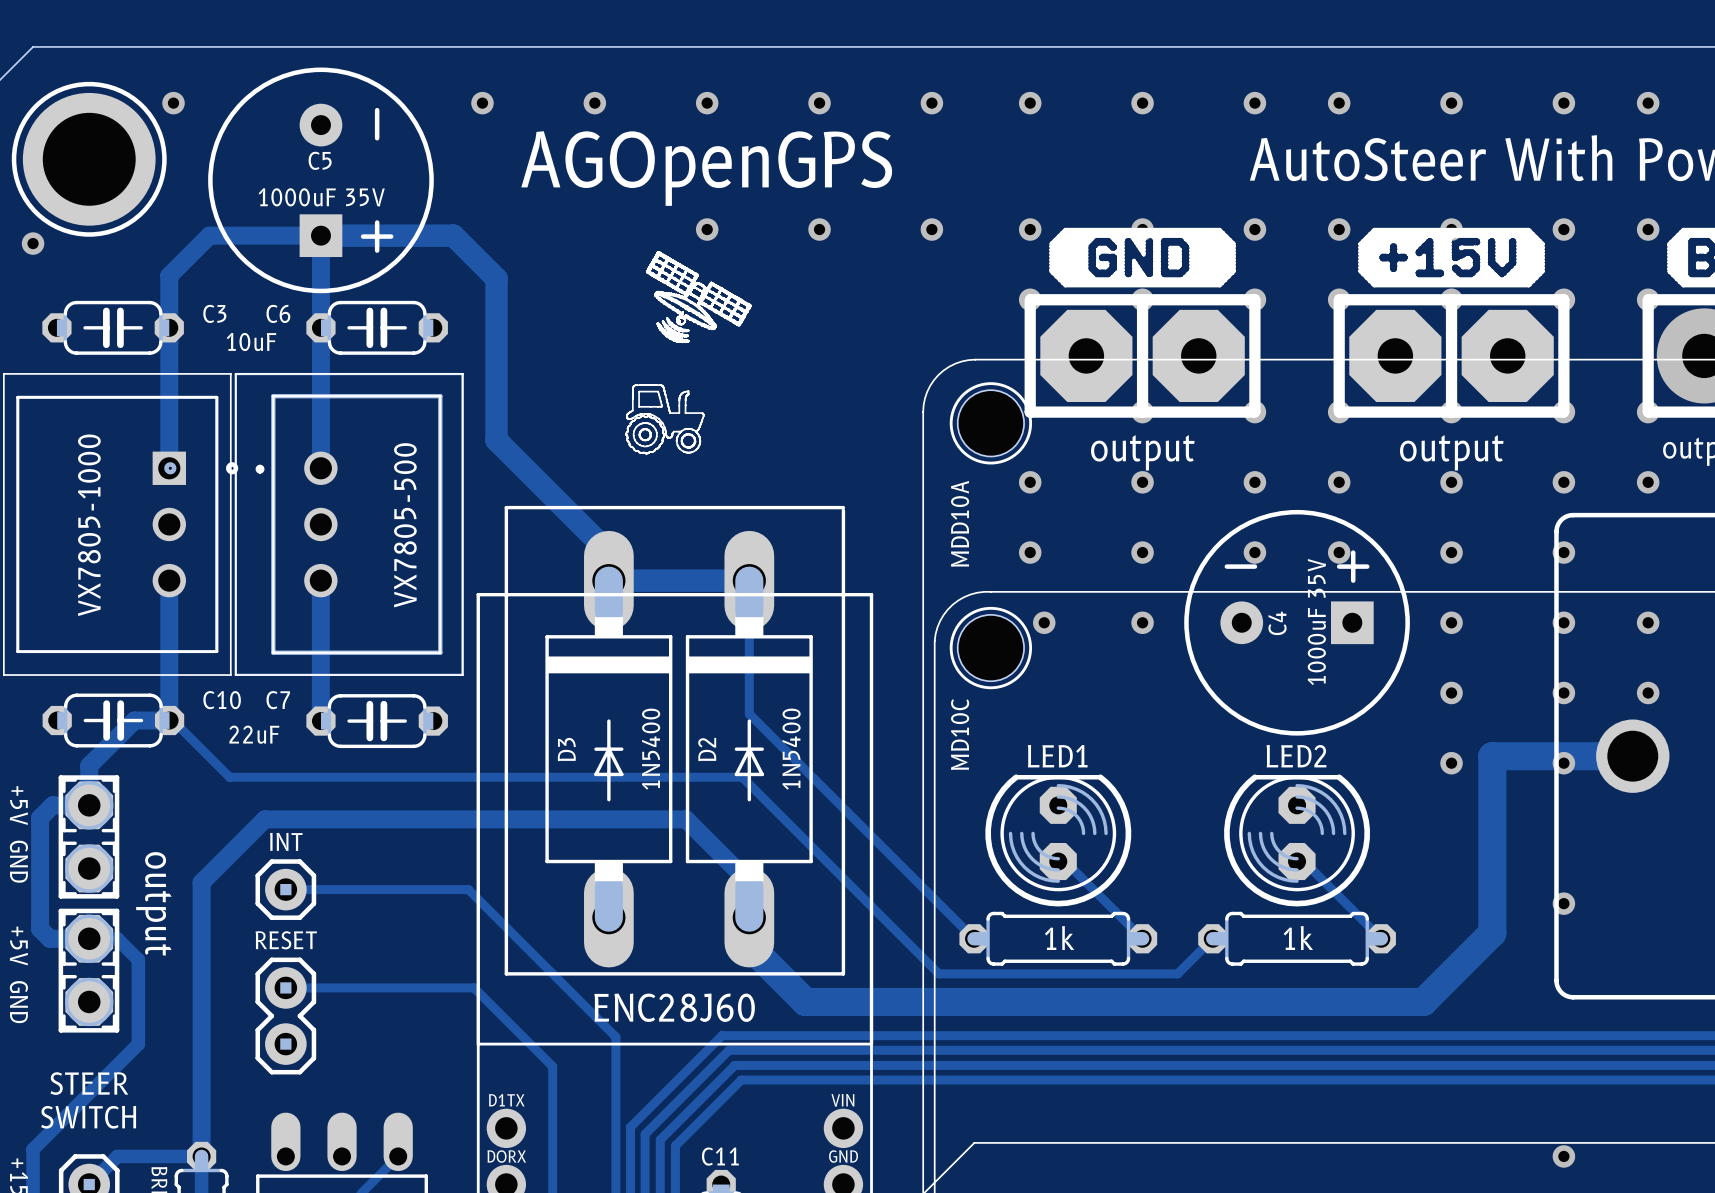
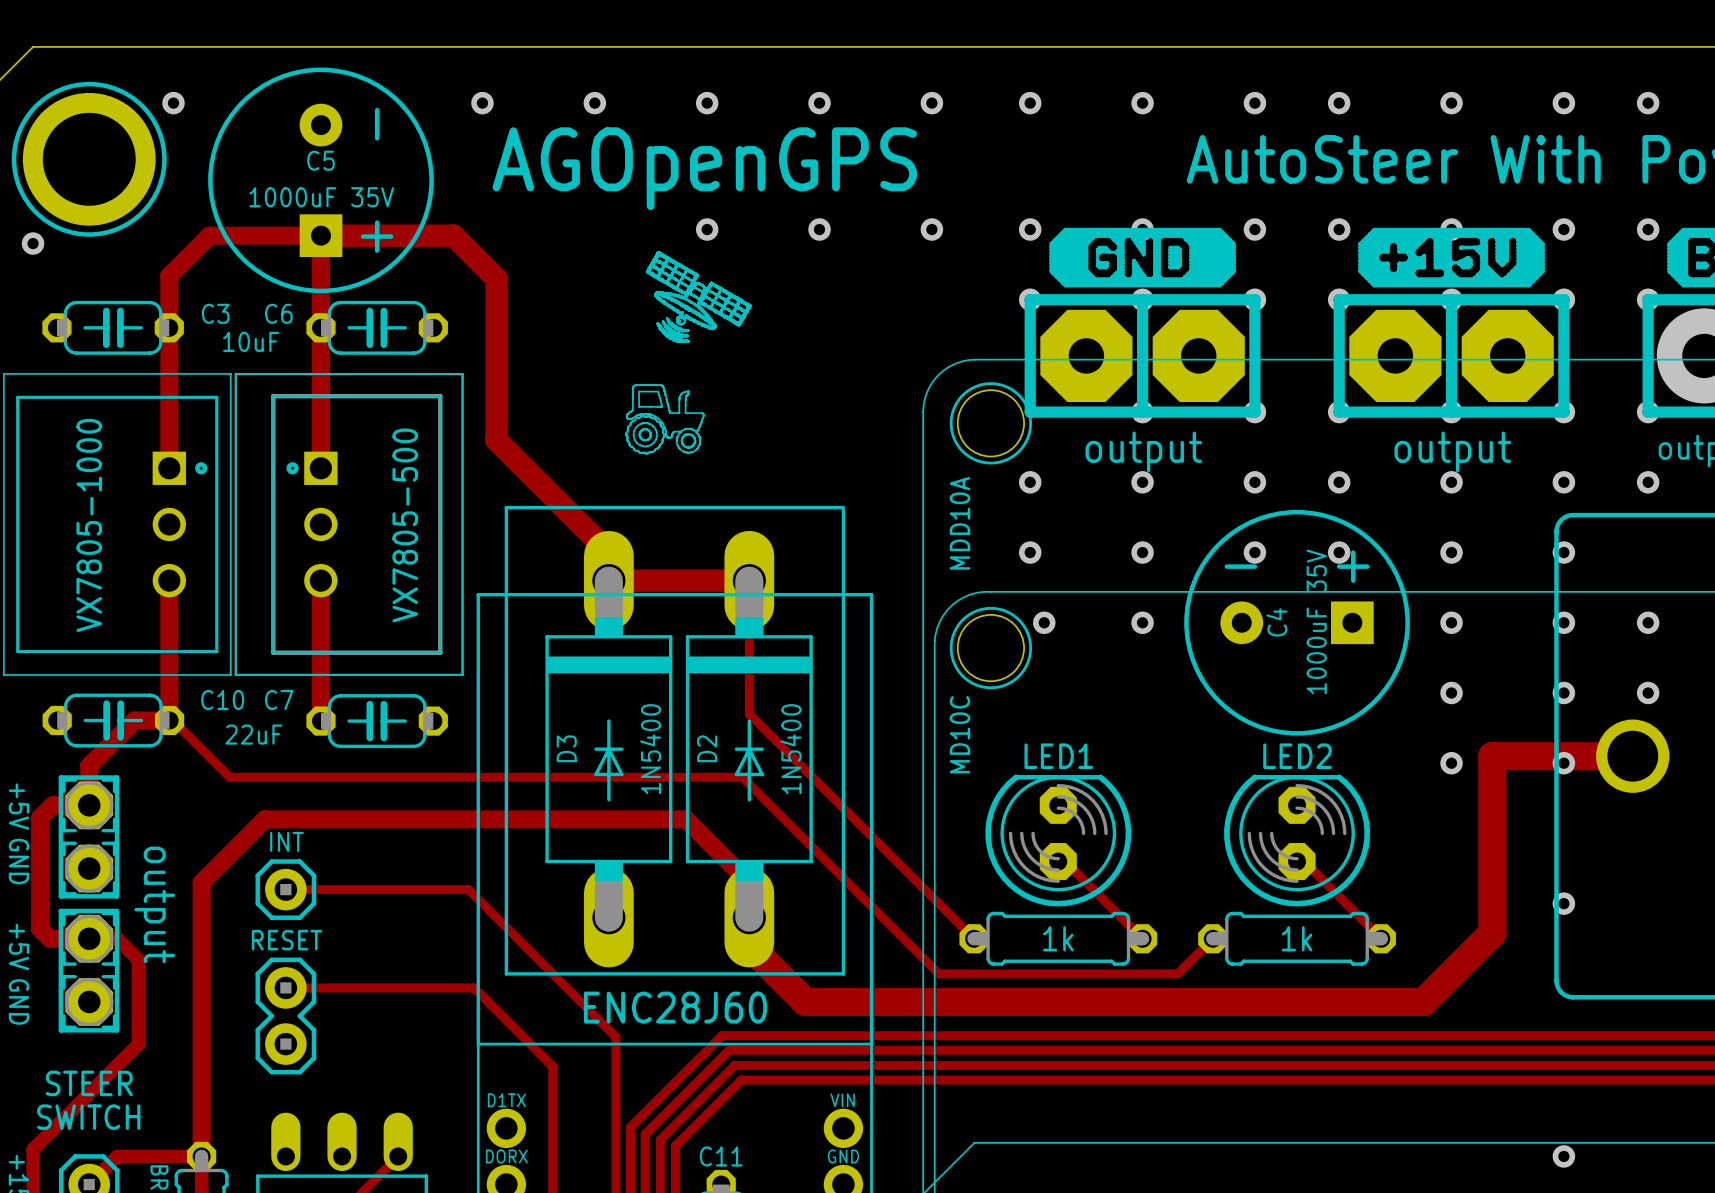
part footprint: [234, 372, 464, 676] -> [234, 372, 464, 676]
part footprint: [16, 395, 239, 654] -> [16, 395, 219, 654]

